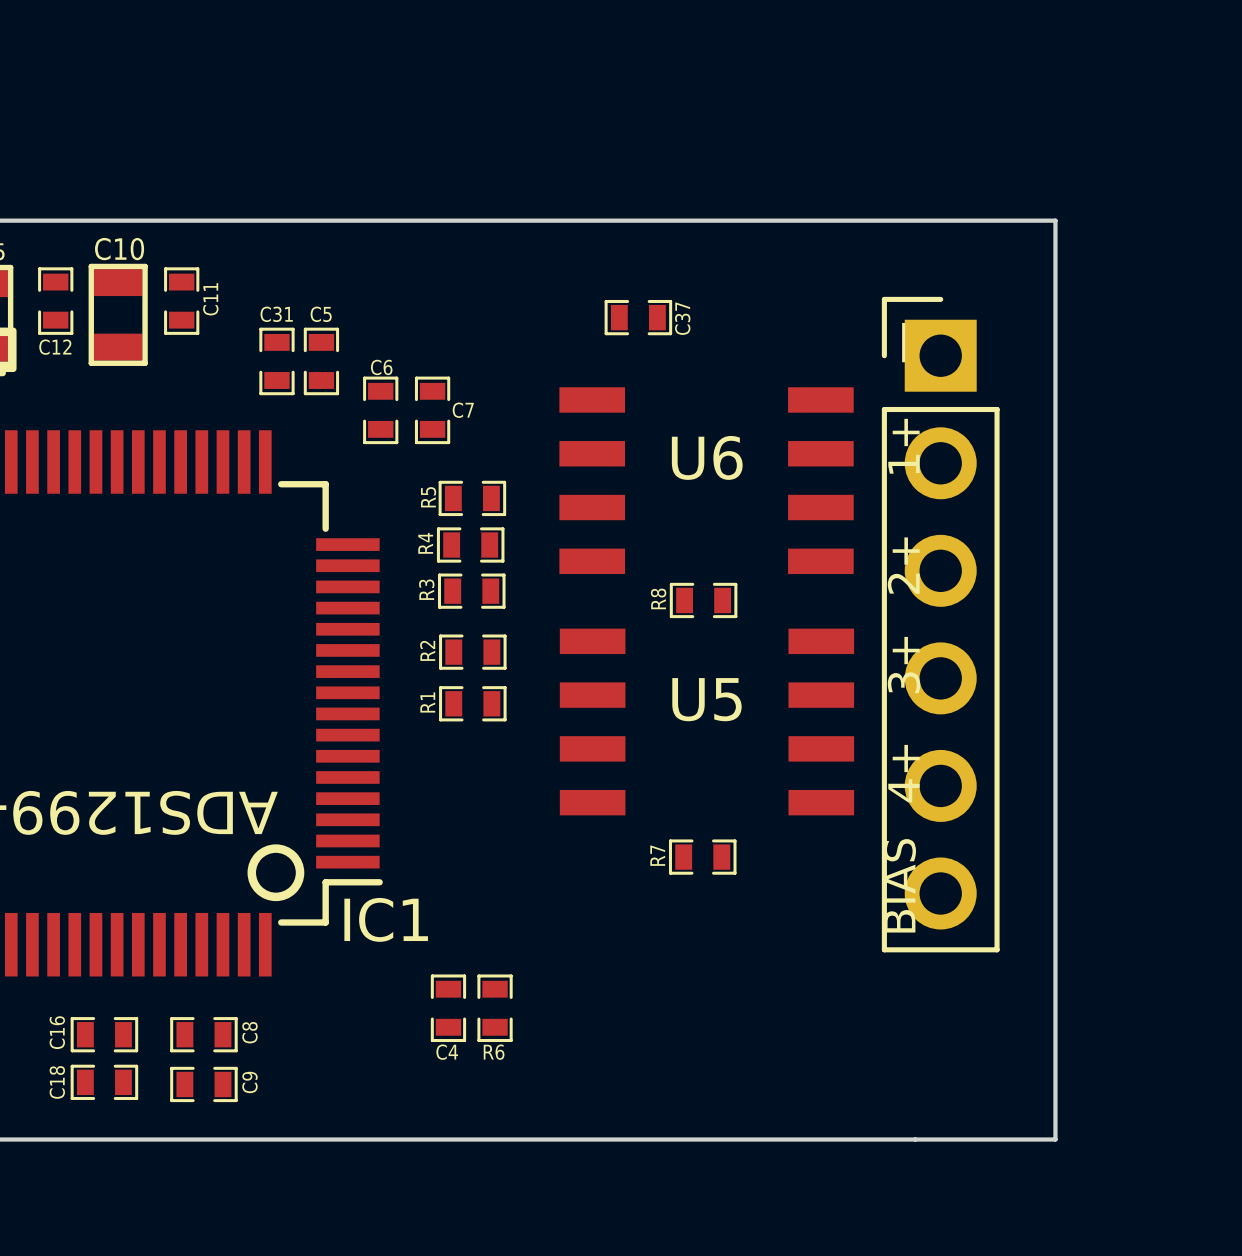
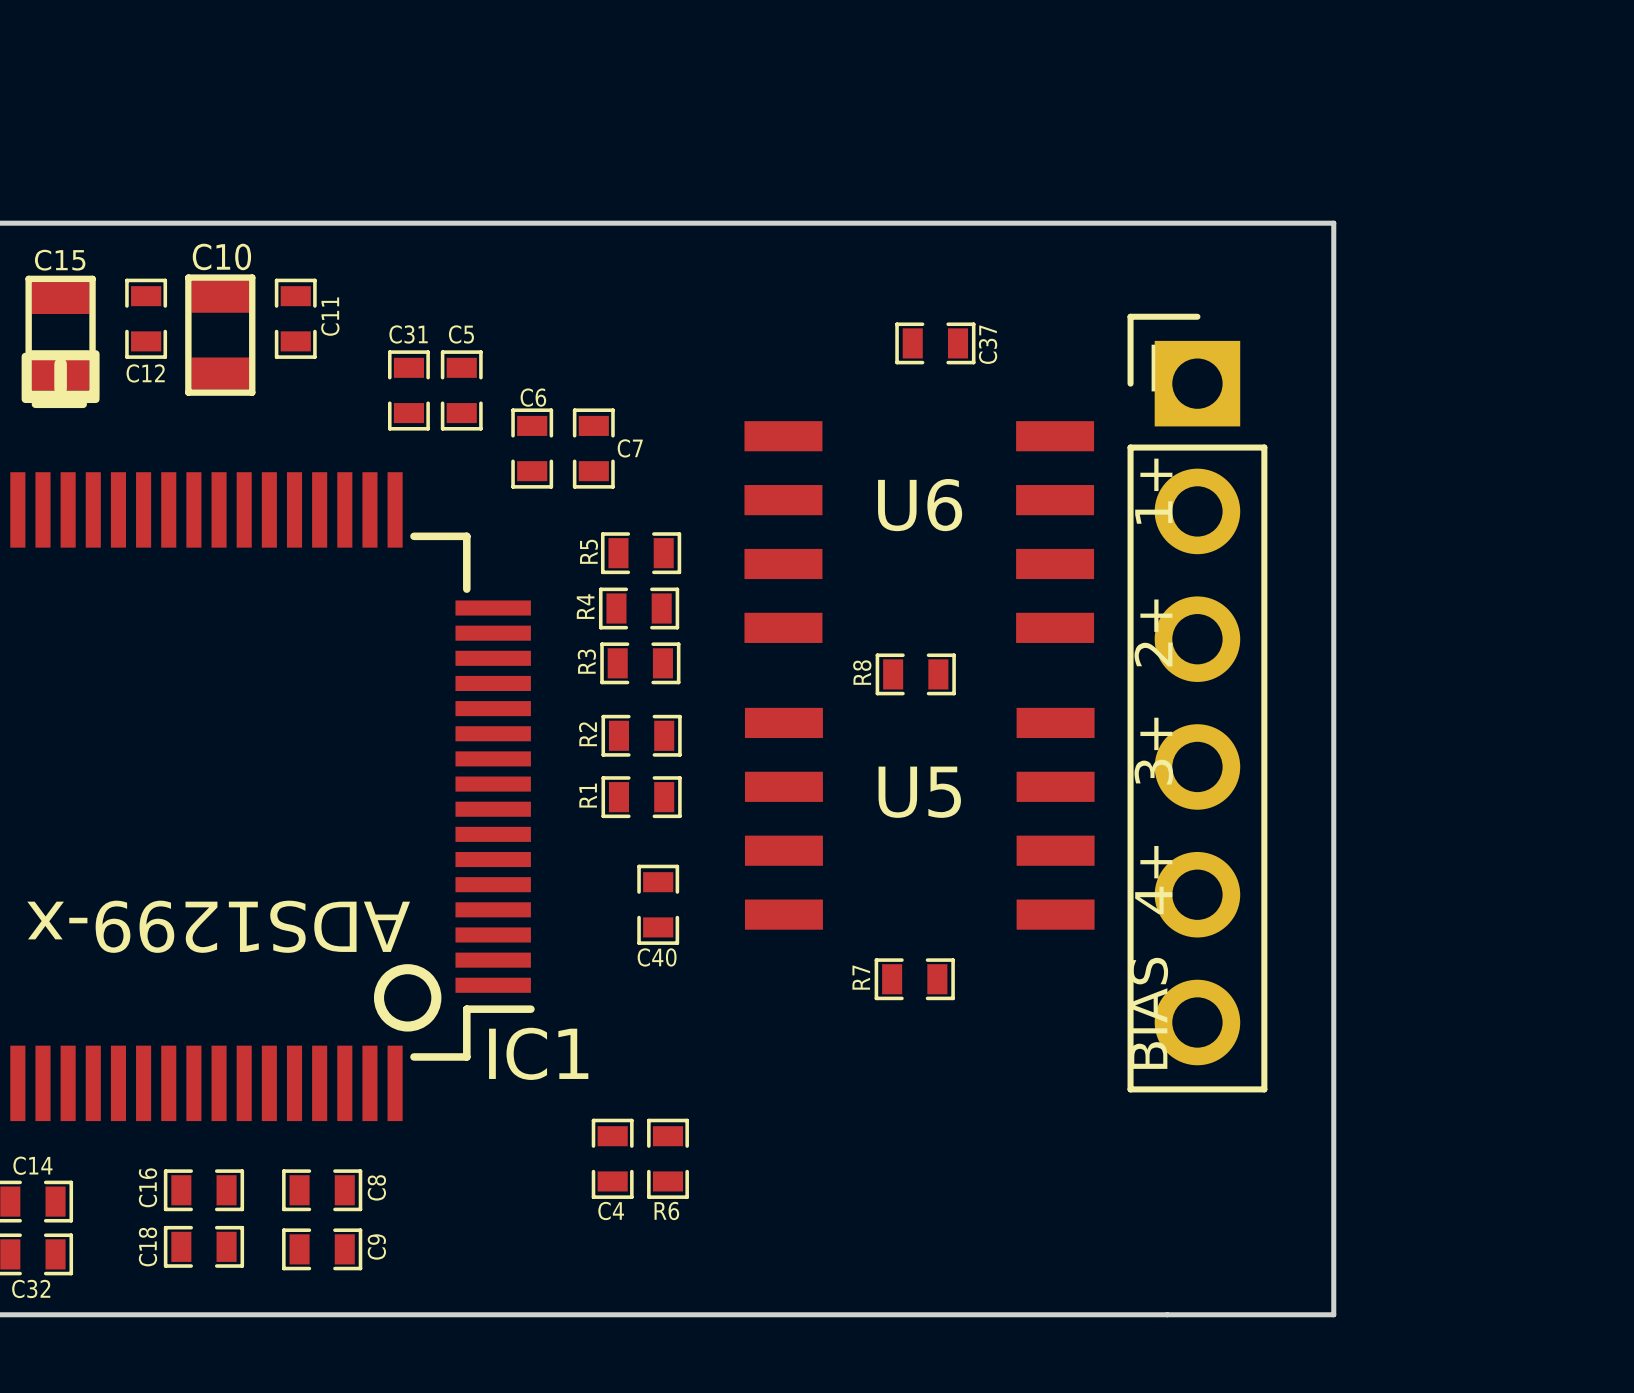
C37 position: (638, 317) -> (935, 343)
C40: none -> (658, 904)

